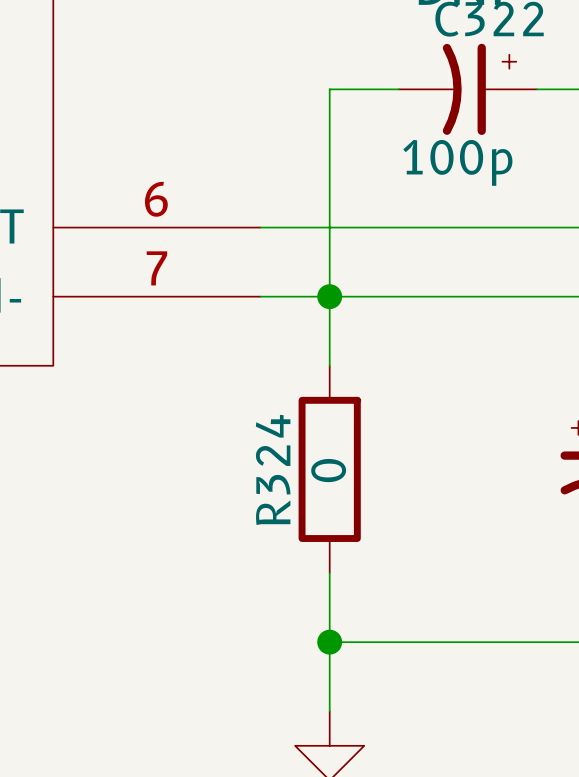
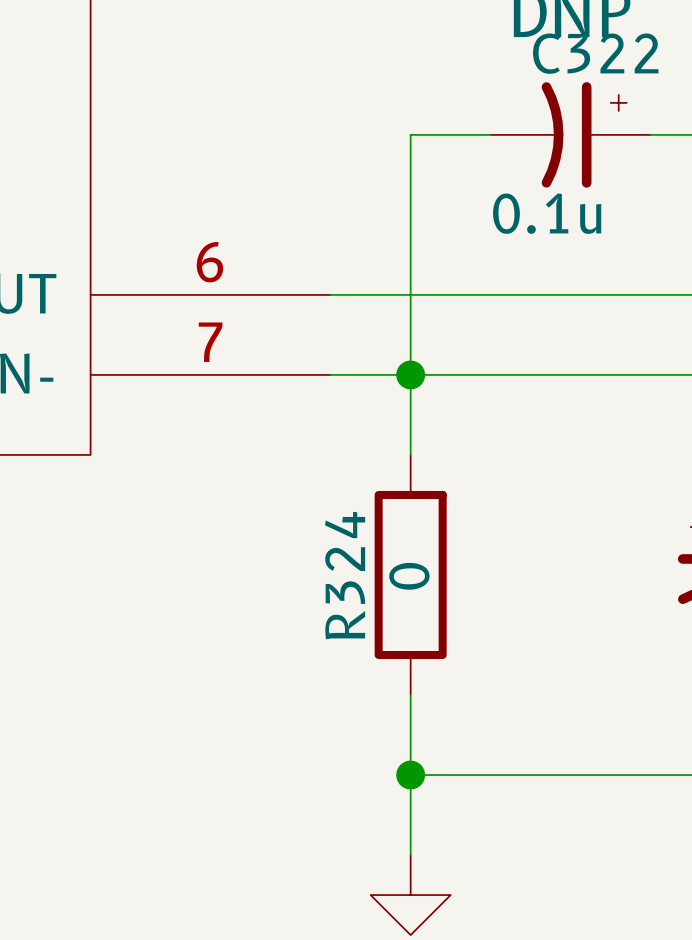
C322 value: 100p (457, 162) -> 0.1u (547, 213)

